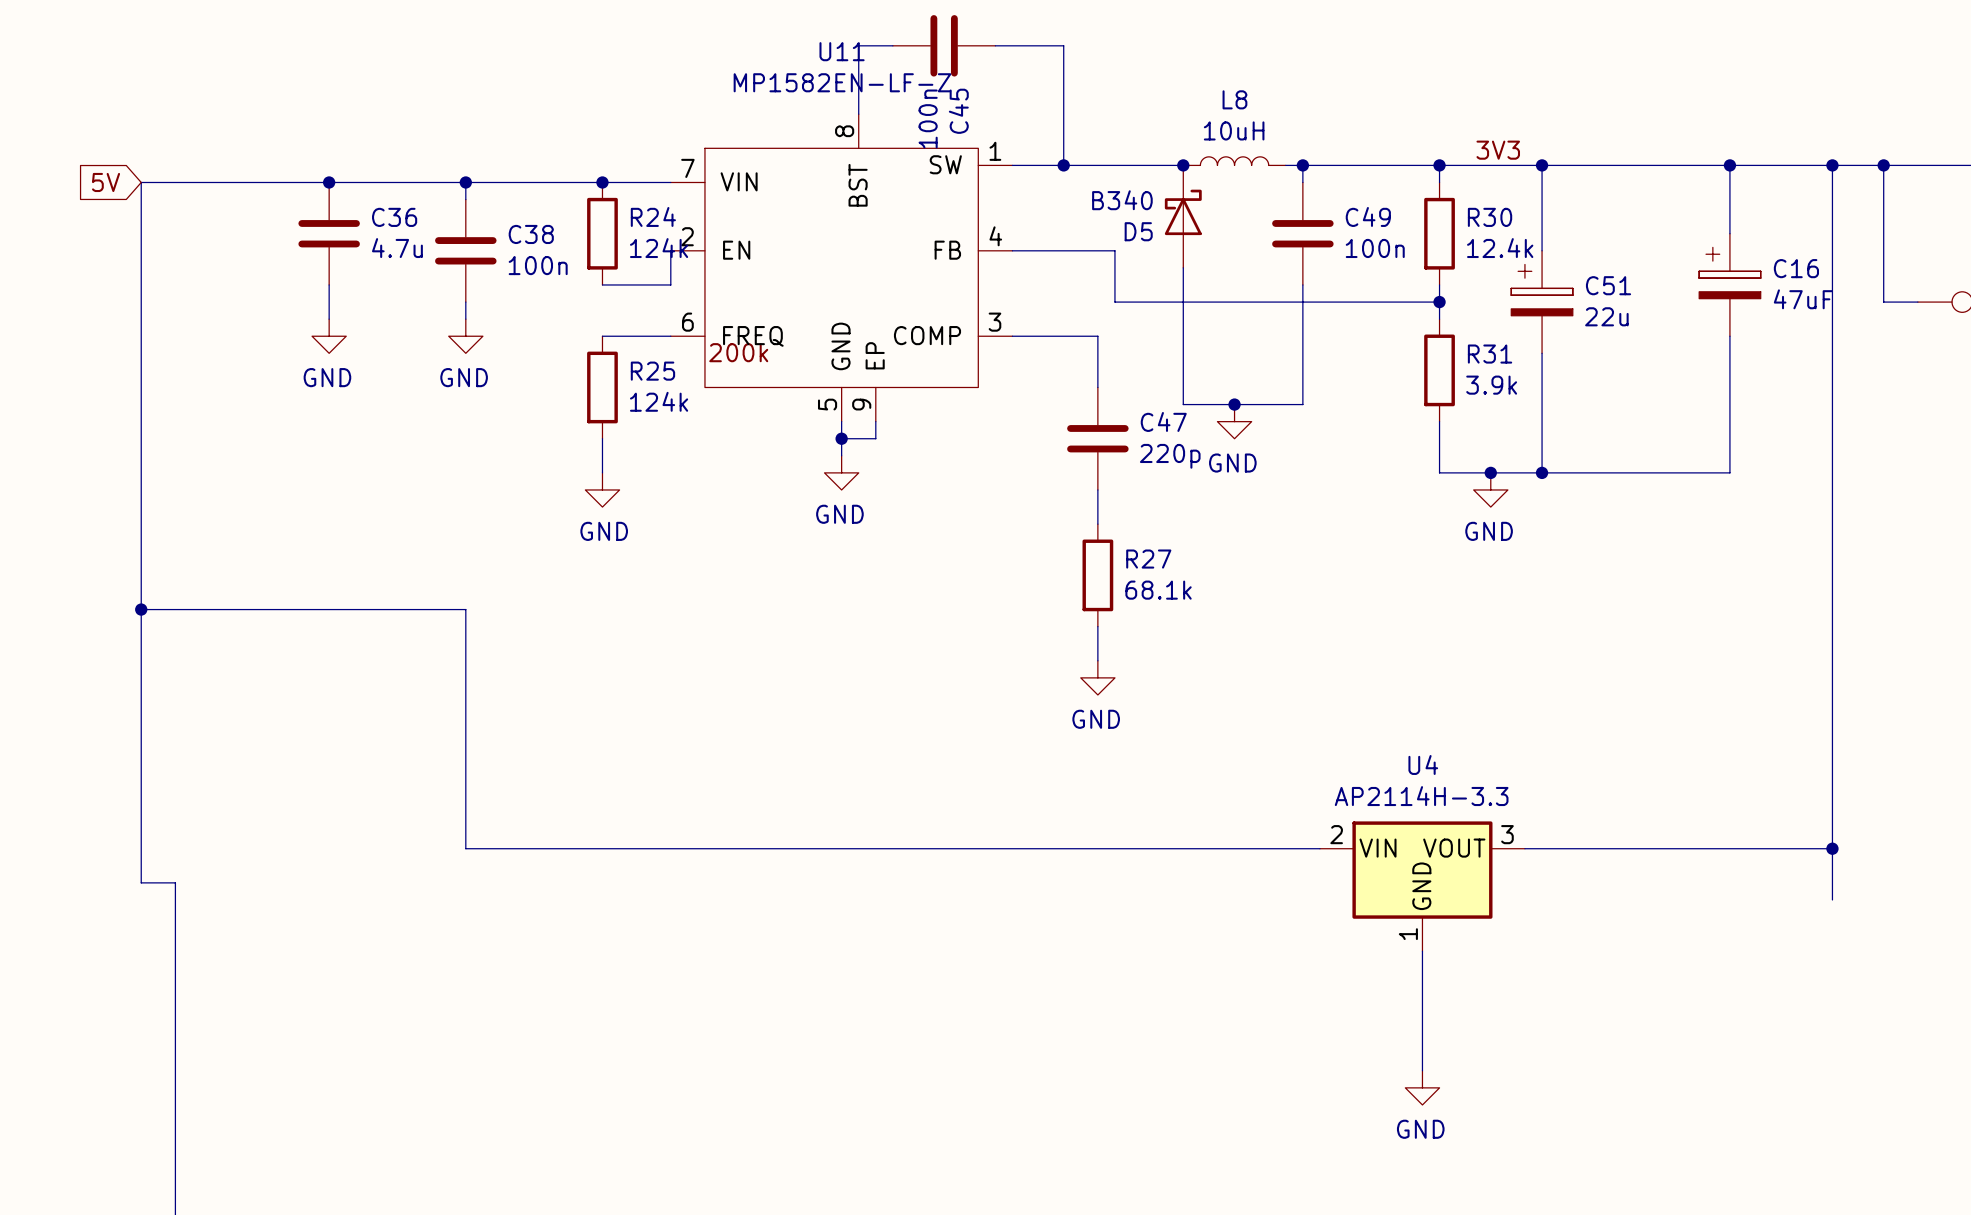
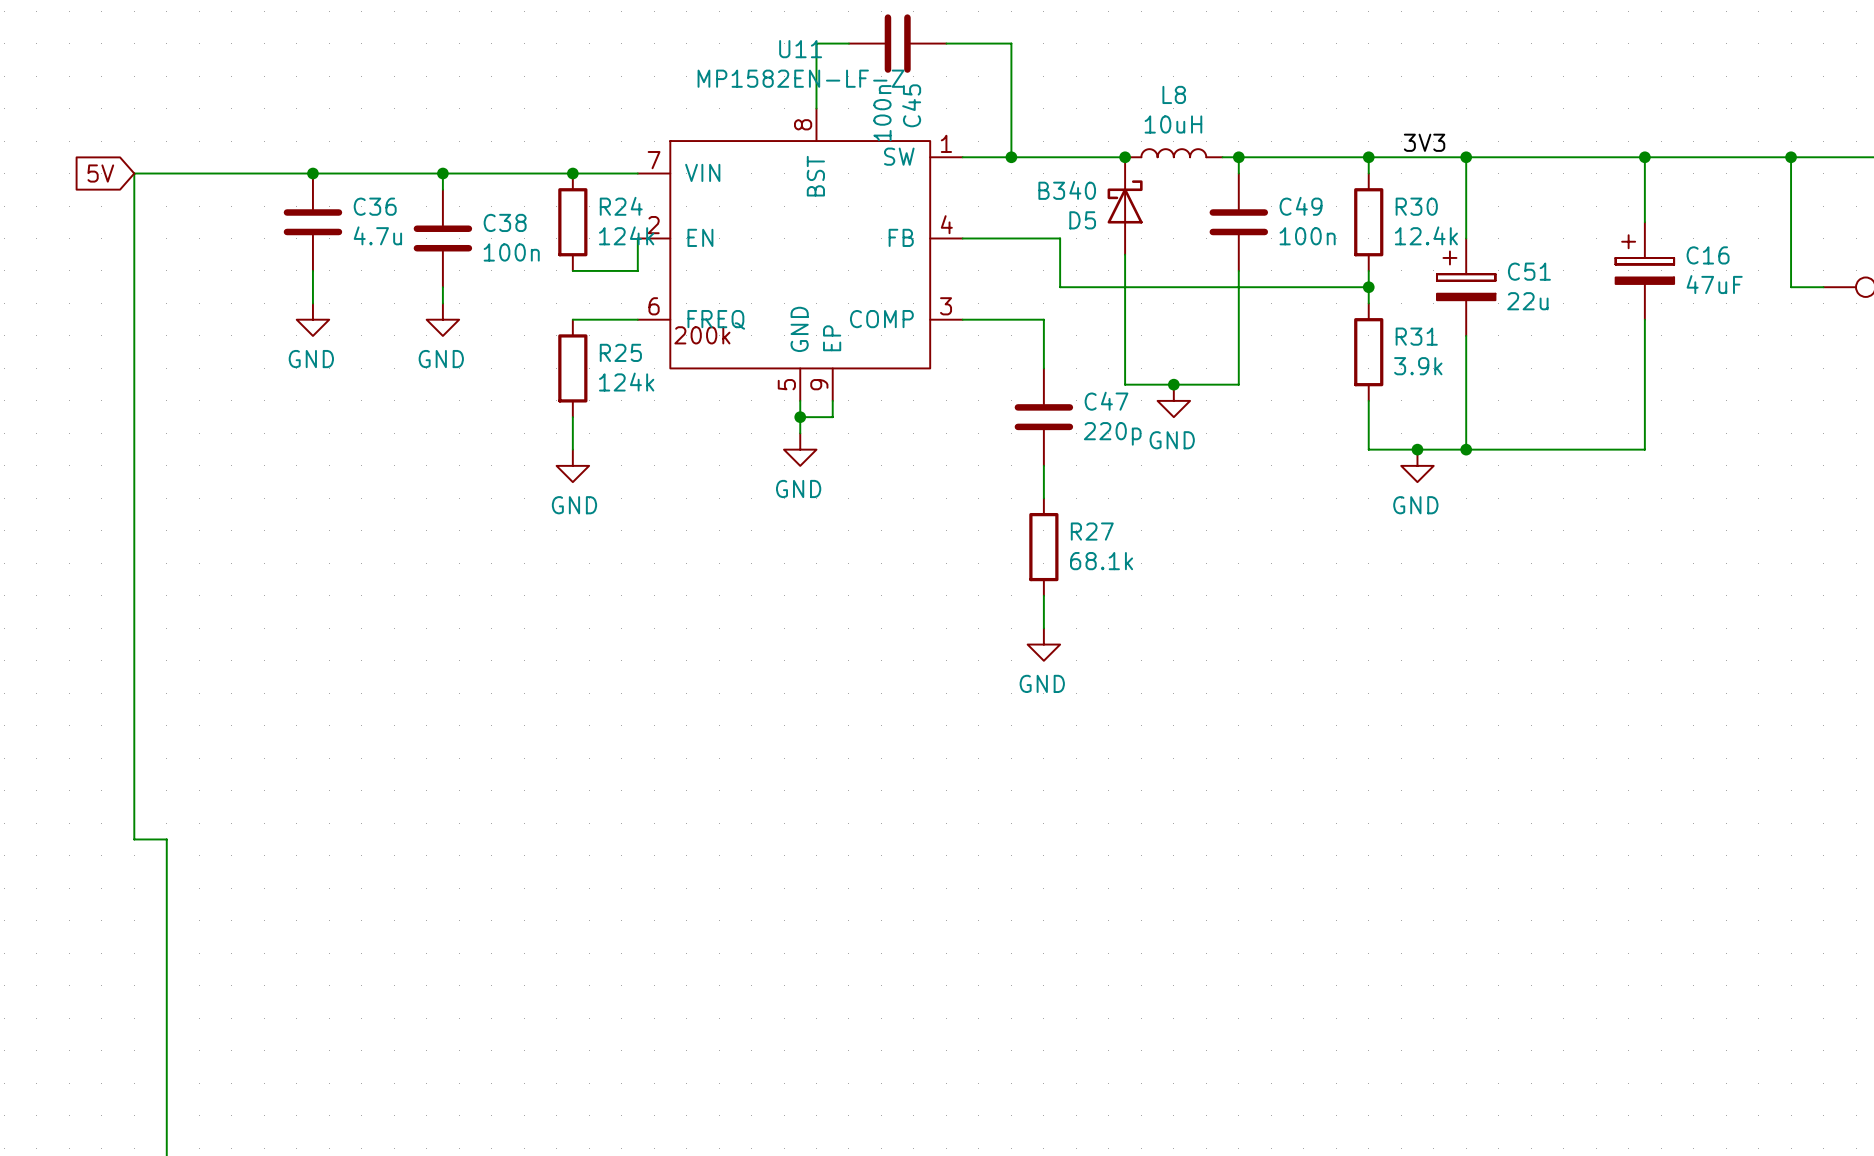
wire: (1832, 165) (1832, 899) -> none
junction: (1832, 165) -> none
wire: (141, 609) (465, 609) (465, 848) (1319, 848) -> none
junction: (141, 609) -> none
wire: (1524, 848) (1832, 848) -> none
junction: (1832, 848) -> none
U4: AP2114H-3.3 (1422, 886) -> none
wire: (1422, 951) (1422, 1070) -> none
power symbol: GND (1422, 1087) -> none

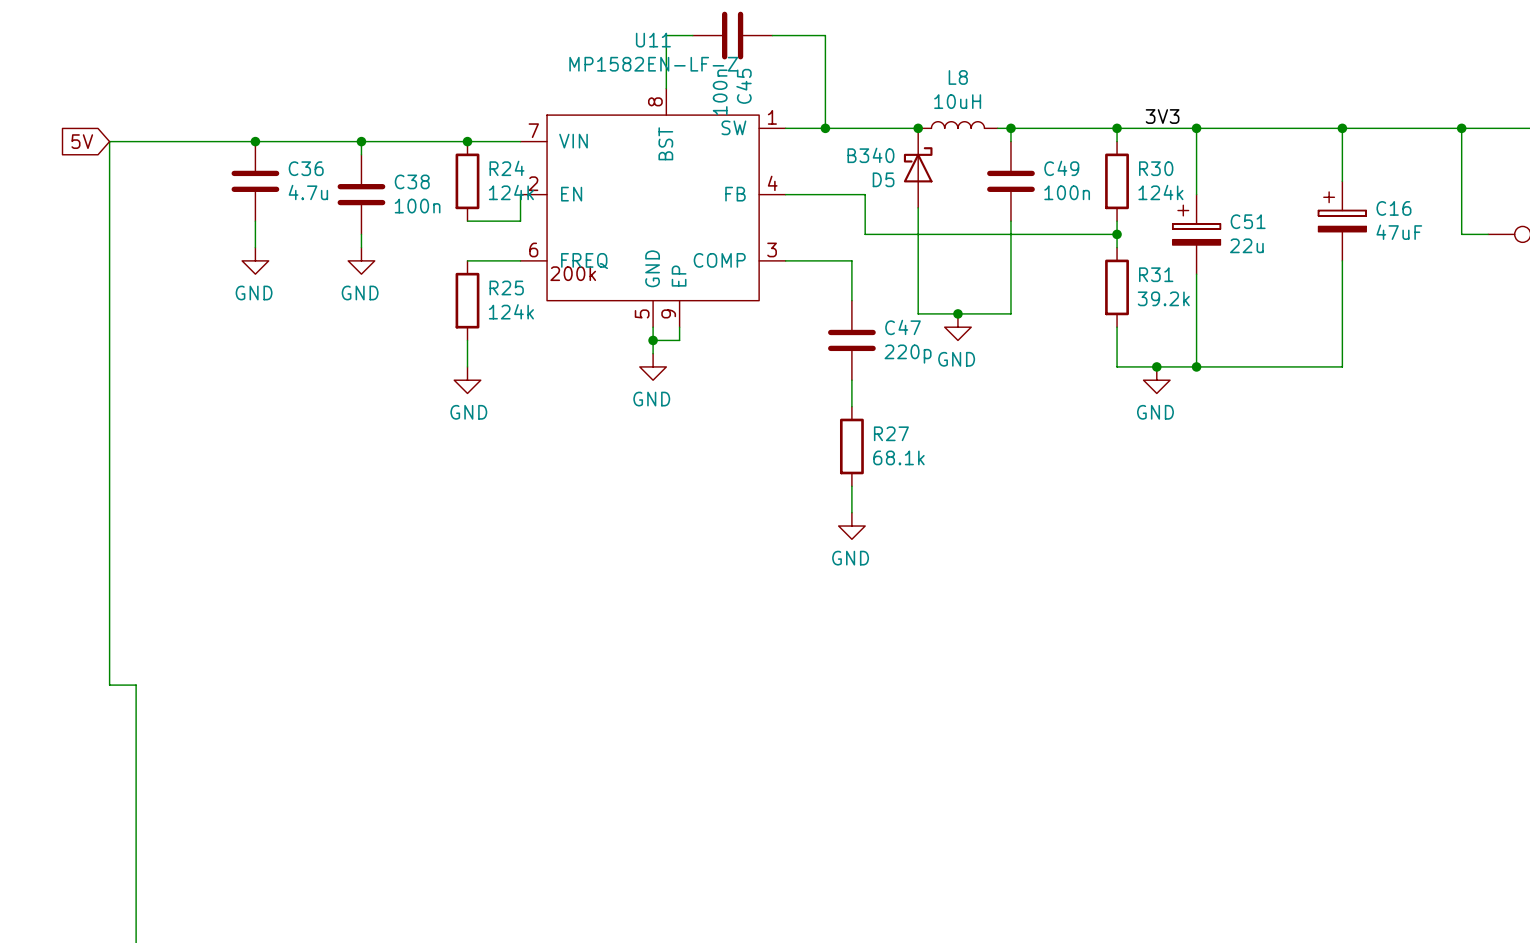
R30 value: 12.4k (1426, 235) -> 124k (1160, 192)
R31 value: 3.9k (1418, 366) -> 39.2k (1163, 298)

